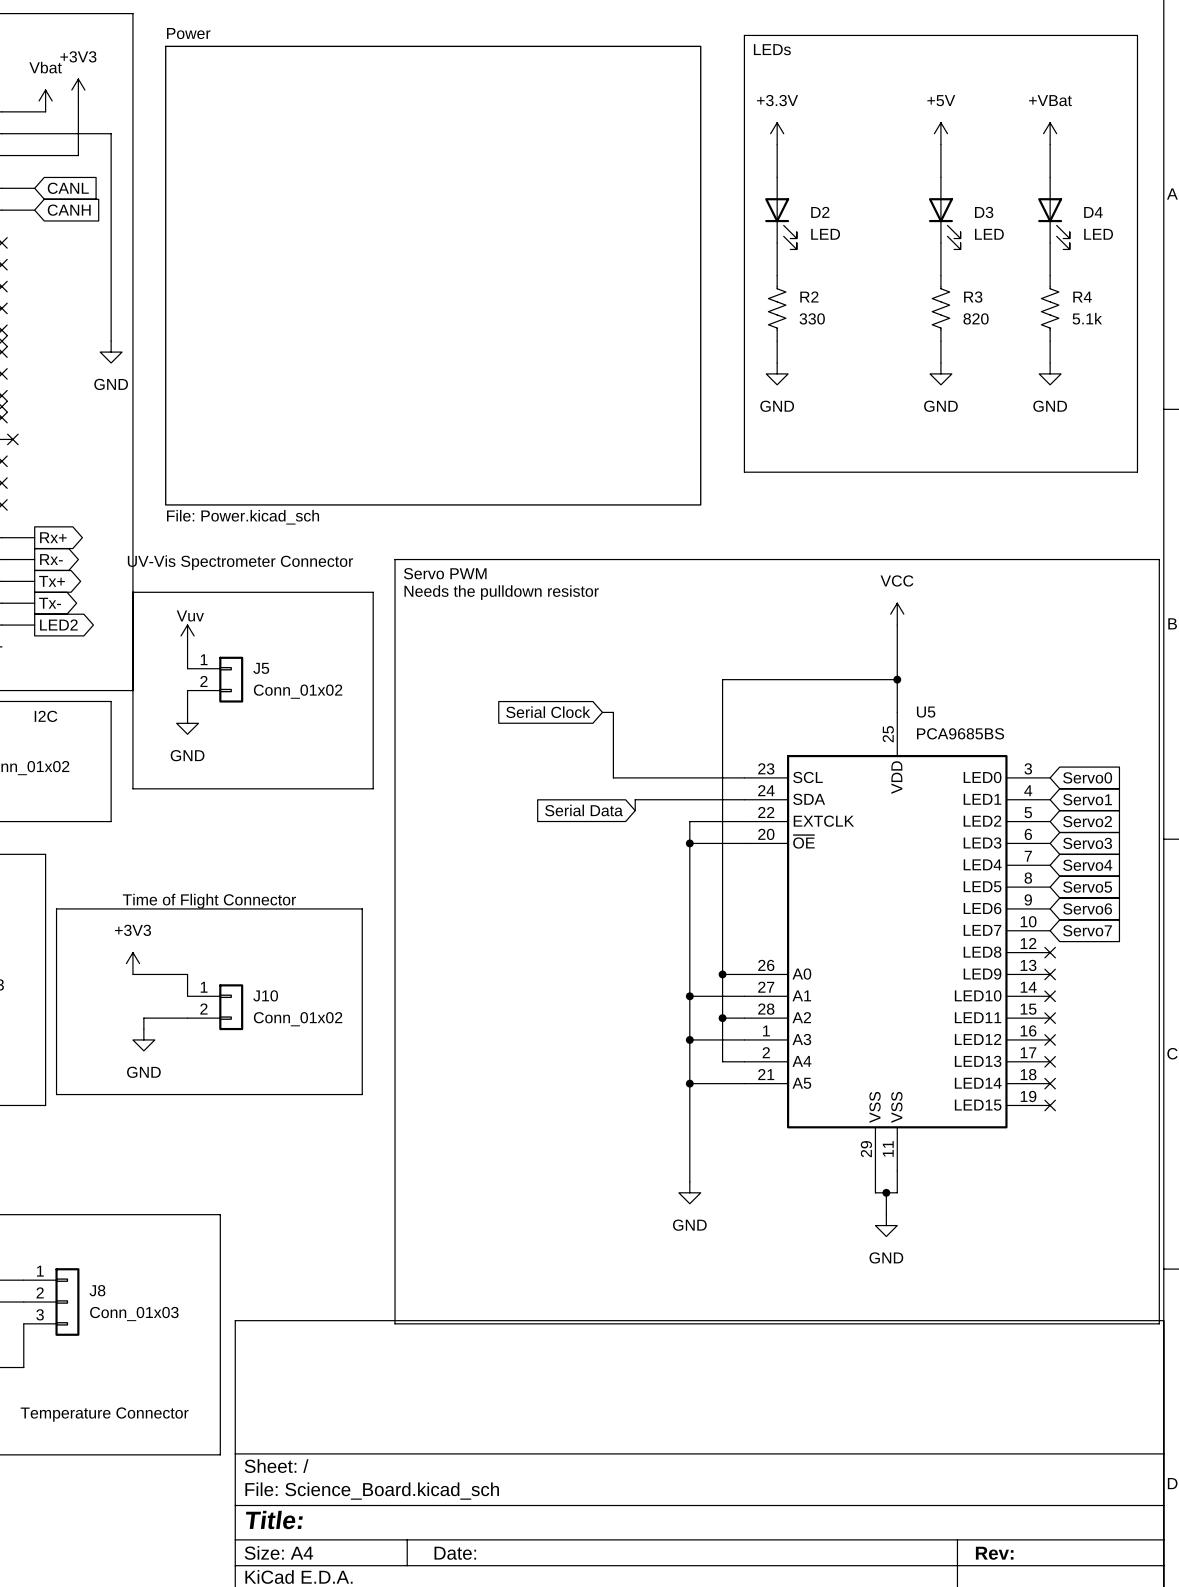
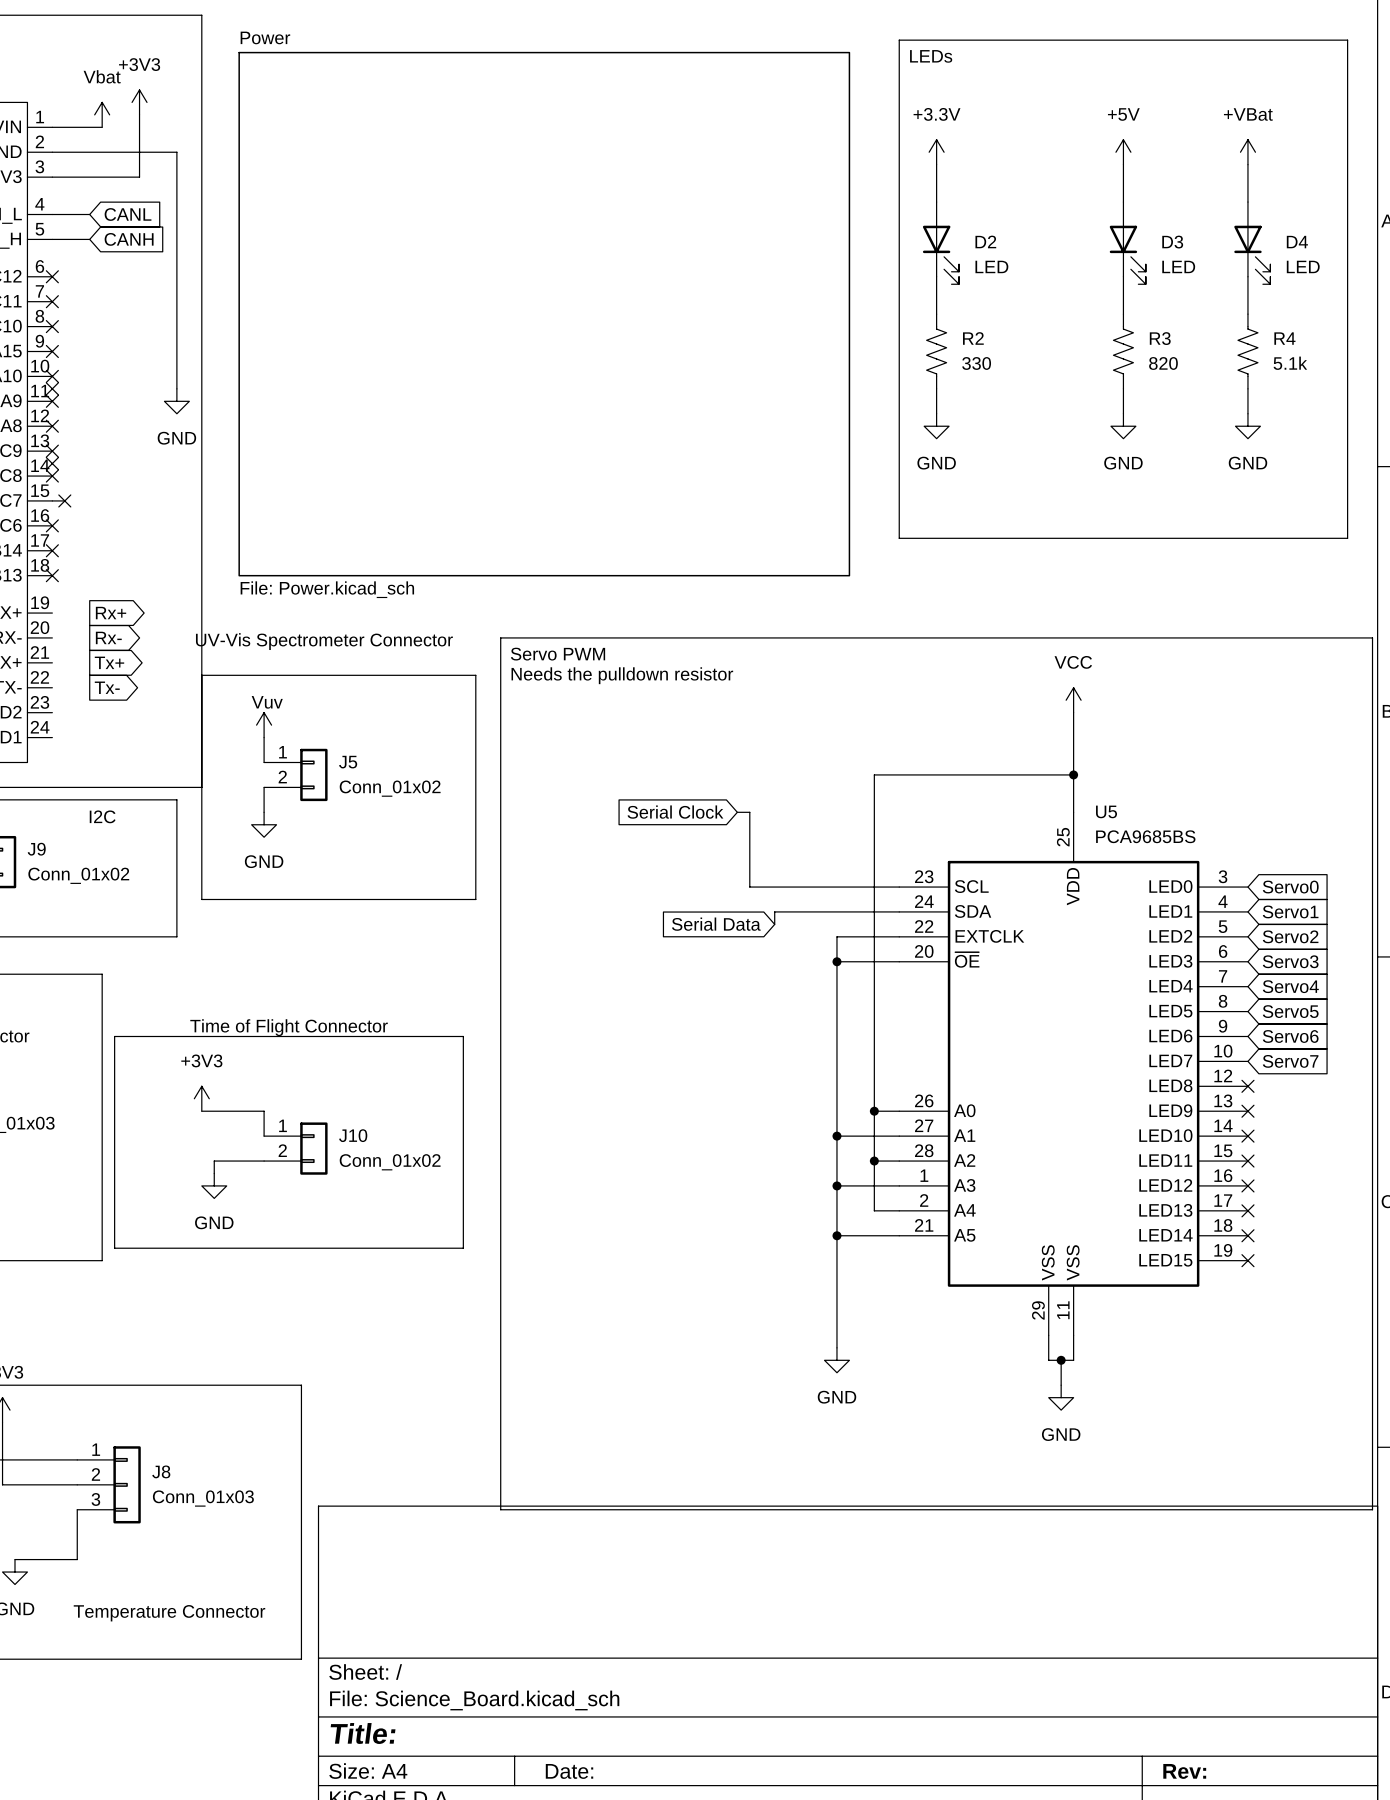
wire: (1, 537) (34, 537) -> none
wire: (1, 559) (34, 559) -> none
wire: (1, 581) (34, 581) -> none
wire: (1, 603) (34, 603) -> none
global label: LED2 (58, 624) -> none
wire: (1, 625) (34, 625) -> none

